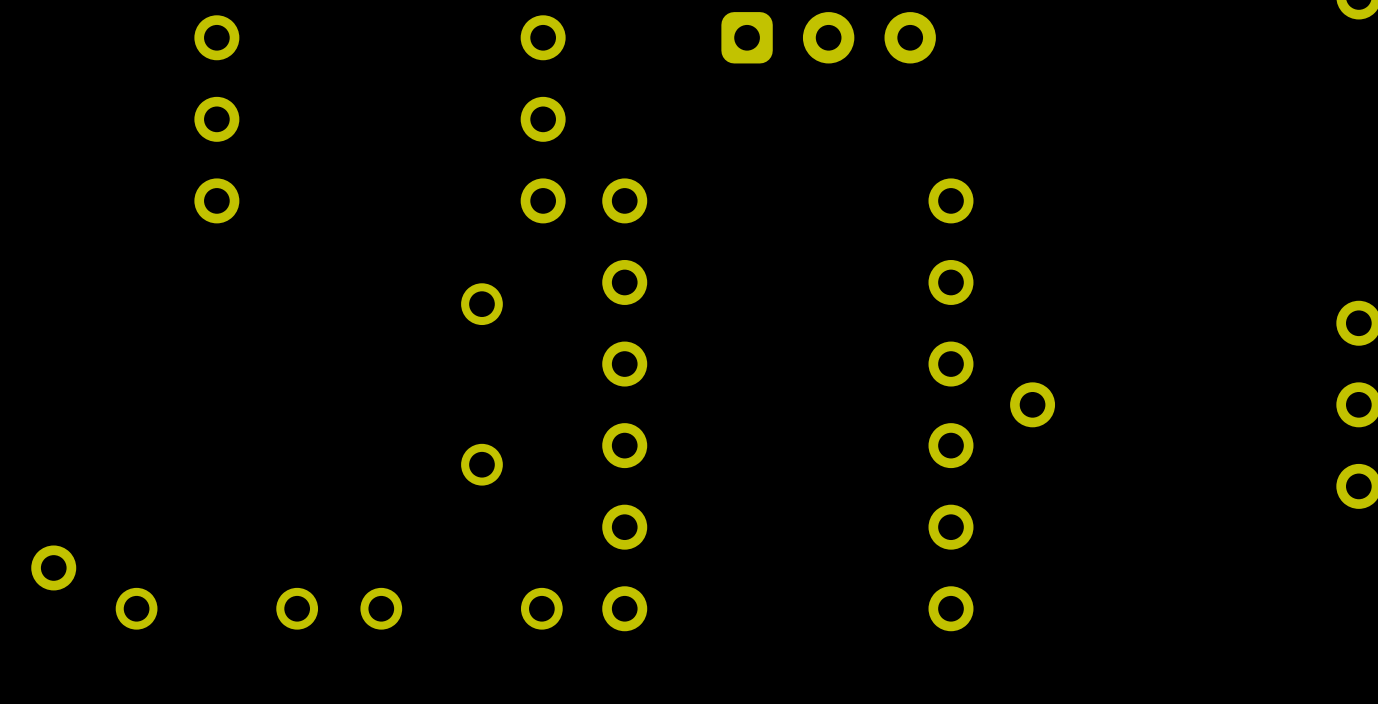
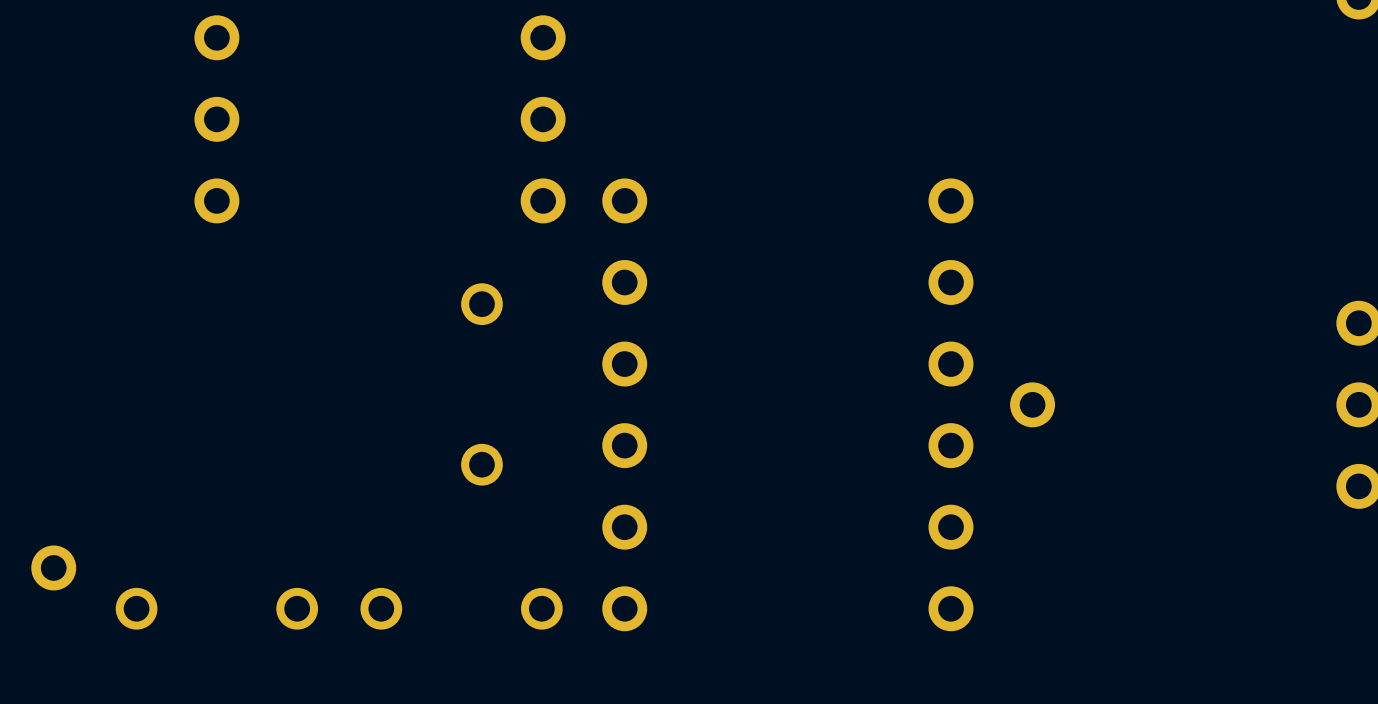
part: (828, 37) -> none

